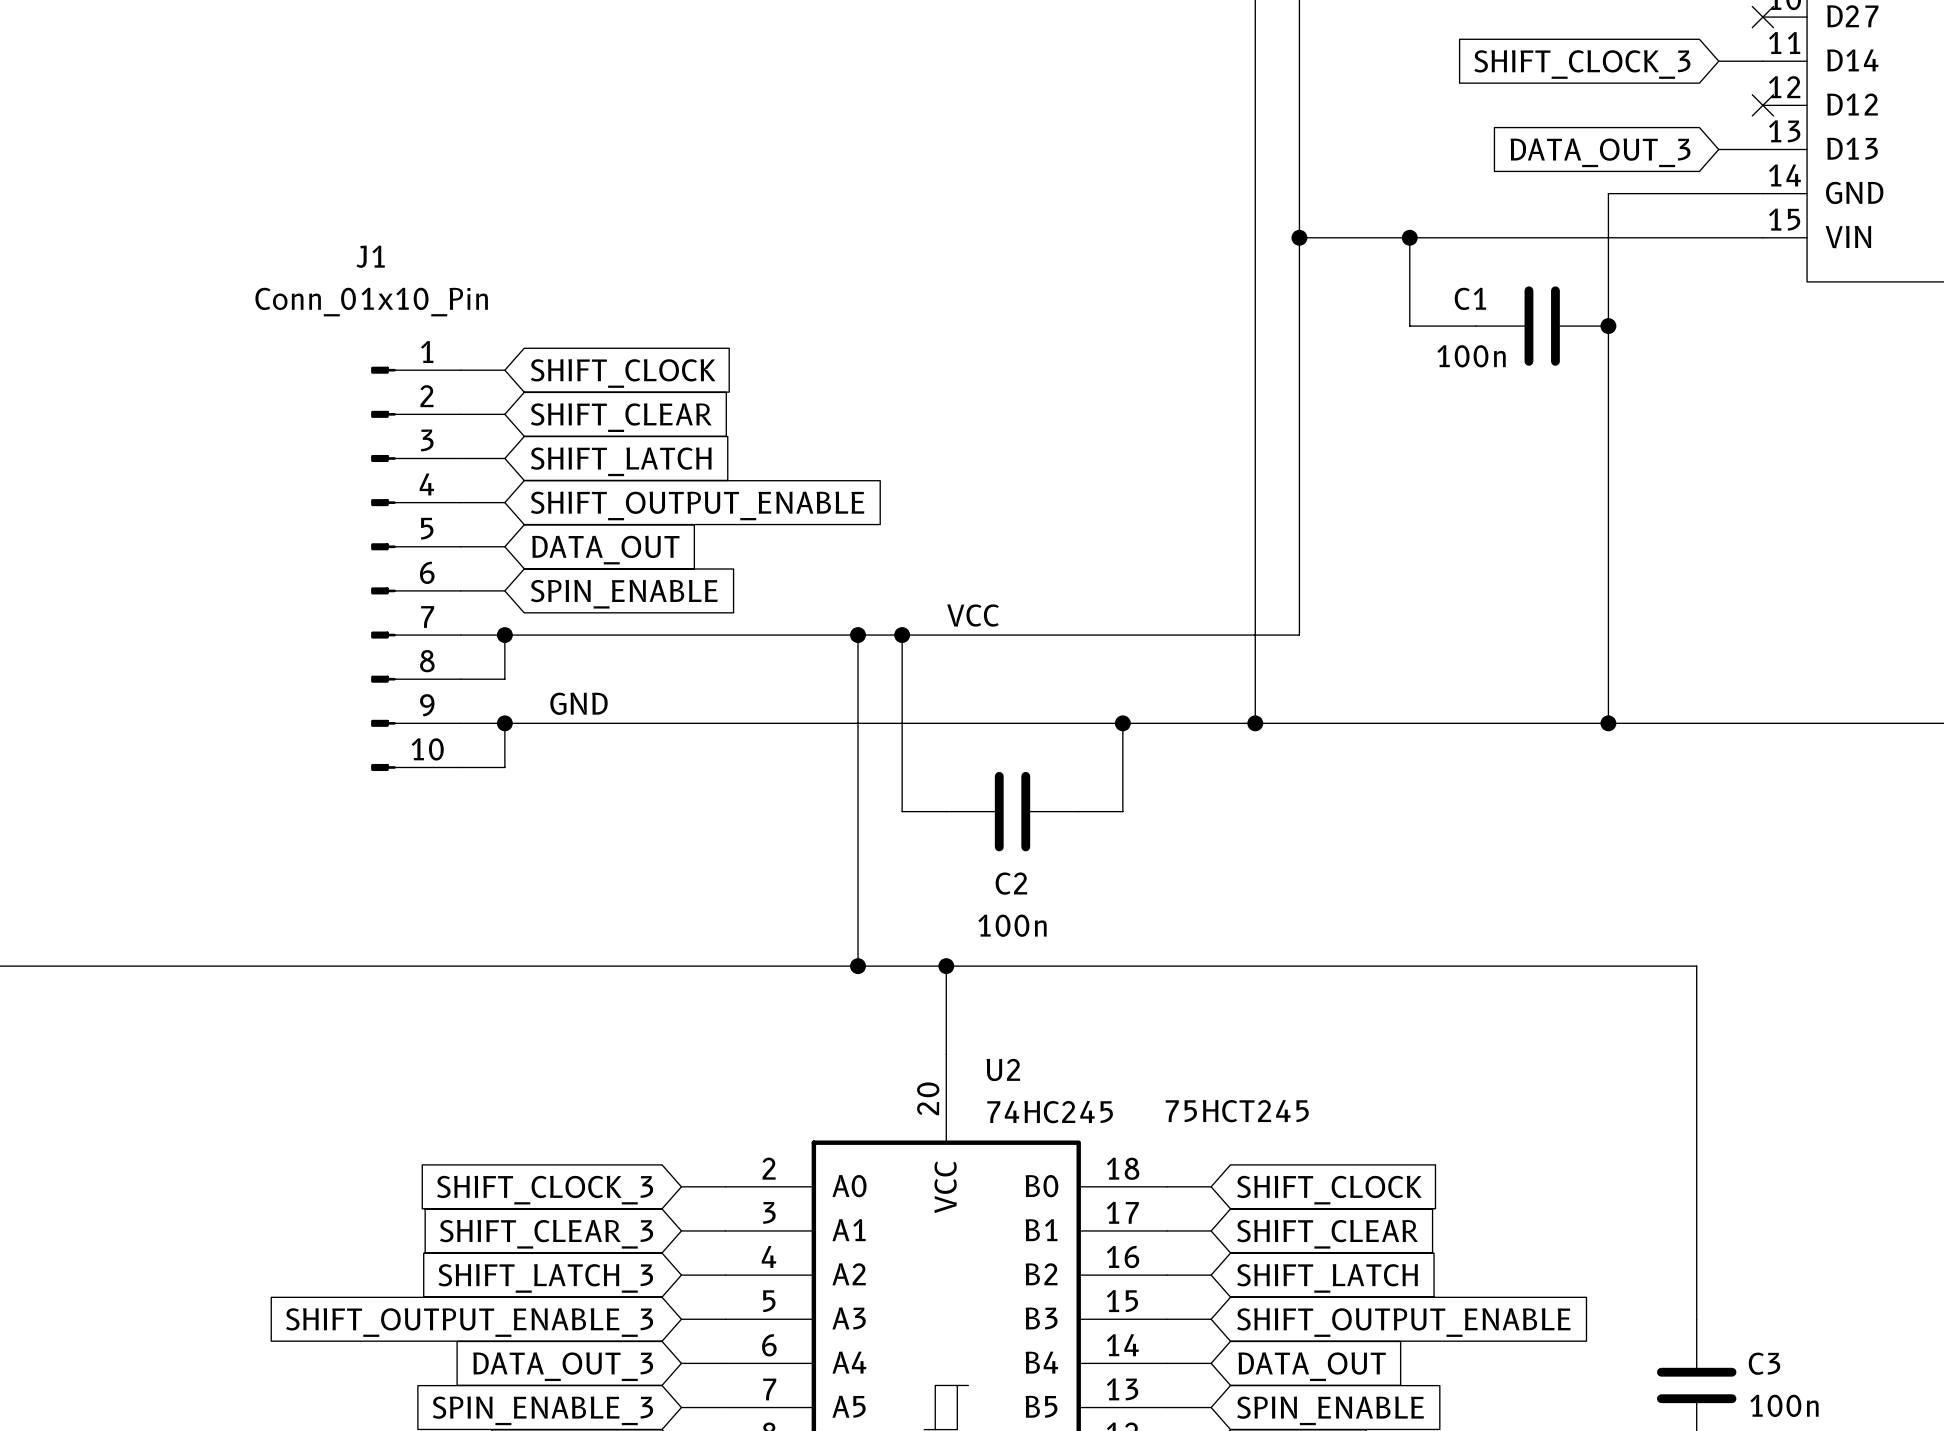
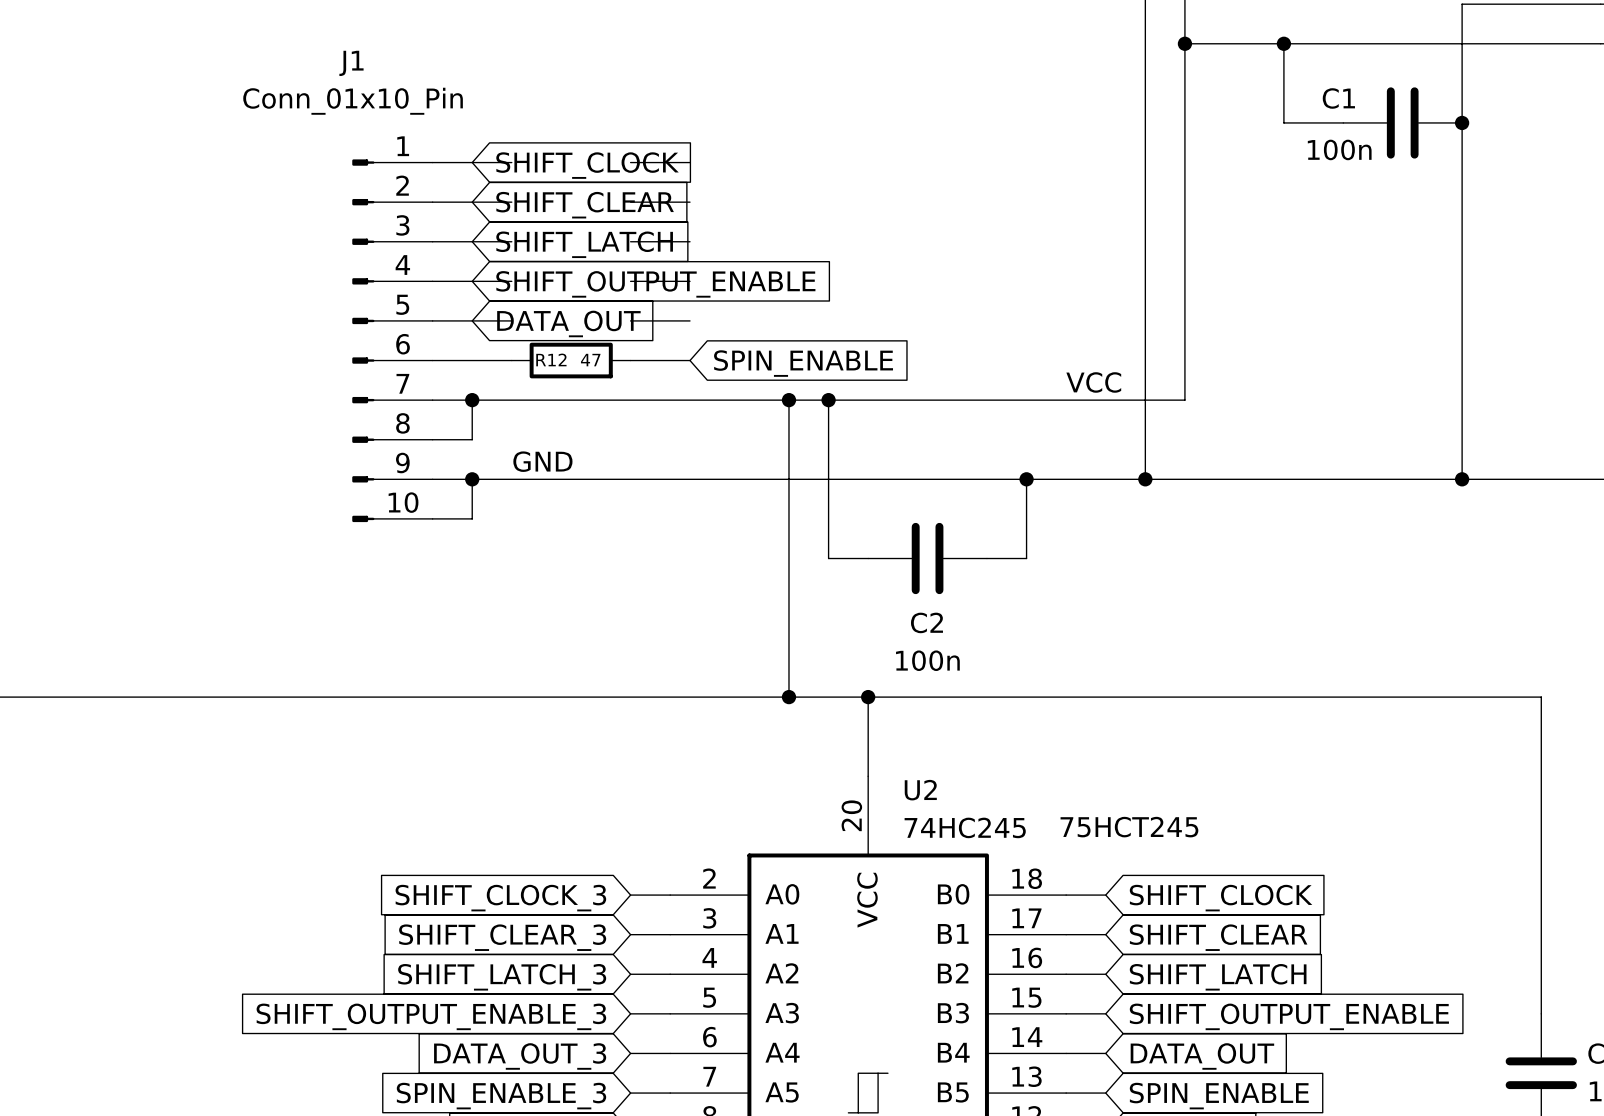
wire: none -> (472, 162) (511, 162)
wire: none -> (630, 162) (690, 162)
wire: none -> (472, 202) (511, 202)
wire: none -> (630, 202) (690, 202)
wire: none -> (472, 241) (511, 241)
wire: none -> (630, 241) (690, 241)
wire: none -> (472, 281) (511, 281)
wire: none -> (630, 281) (690, 281)
wire: none -> (472, 320) (511, 320)
wire: none -> (630, 320) (690, 320)
wire: none -> (472, 360) (511, 360)
R12: none -> 47 (571, 360)
wire: none -> (630, 360) (690, 360)
global label position: SPIN_ENABLE (624, 594) -> SPIN_ENABLE (803, 363)
label position: VCC (973, 615) -> VCC (1093, 382)

